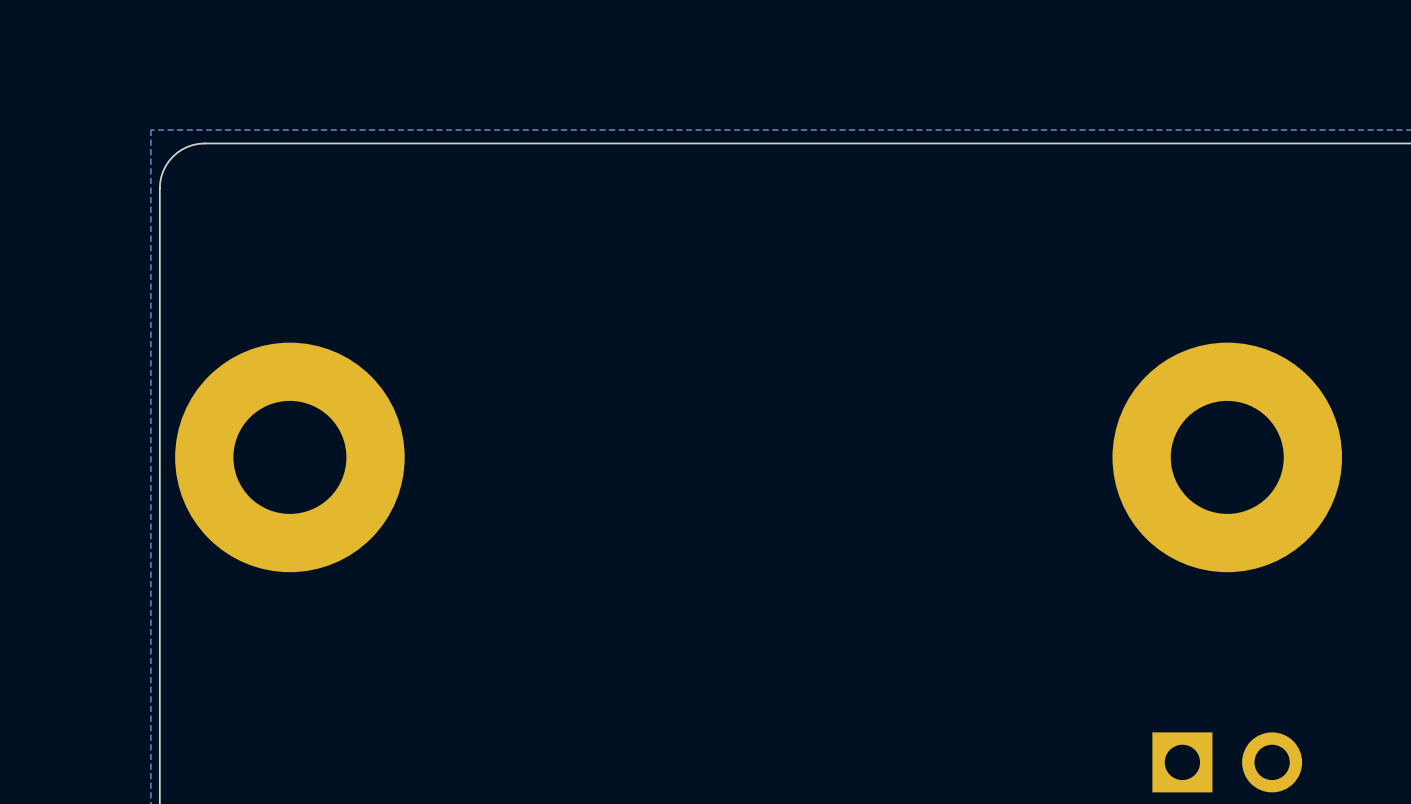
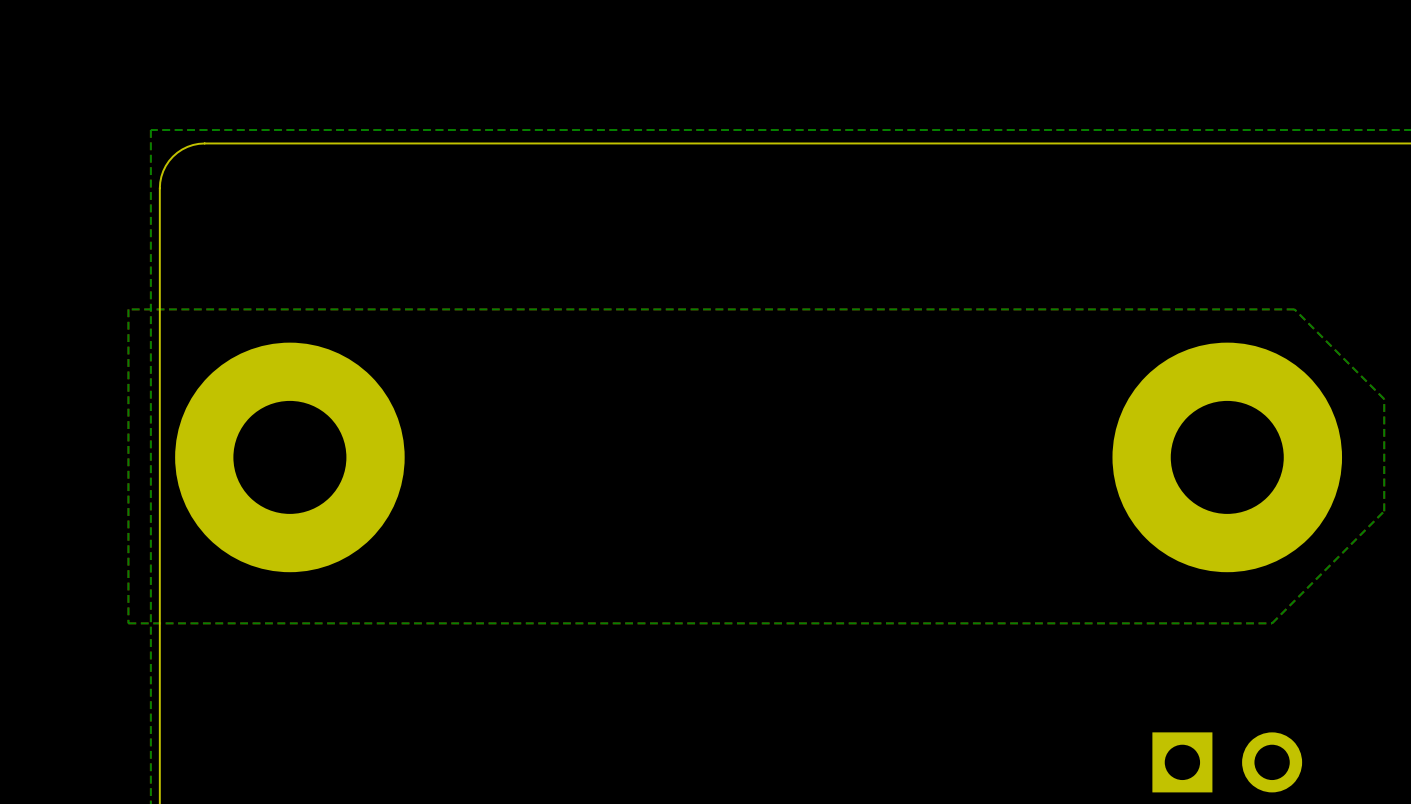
bottom zone outline: none -> (1294, 309) (1384, 399) (1384, 511) (1272, 623) (128, 623) (128, 309) (1294, 309)

